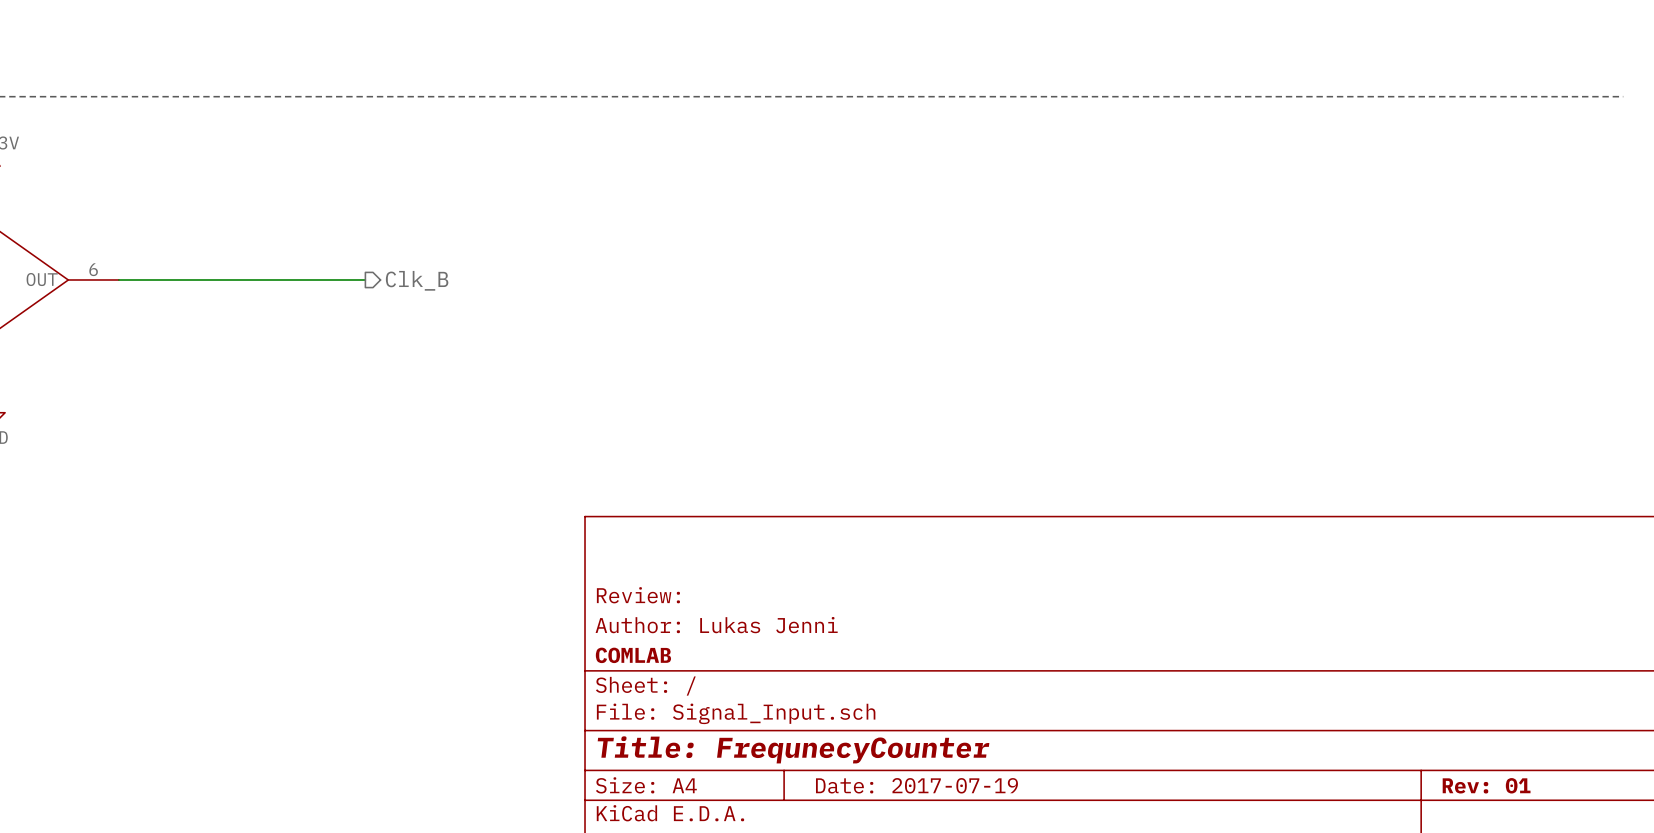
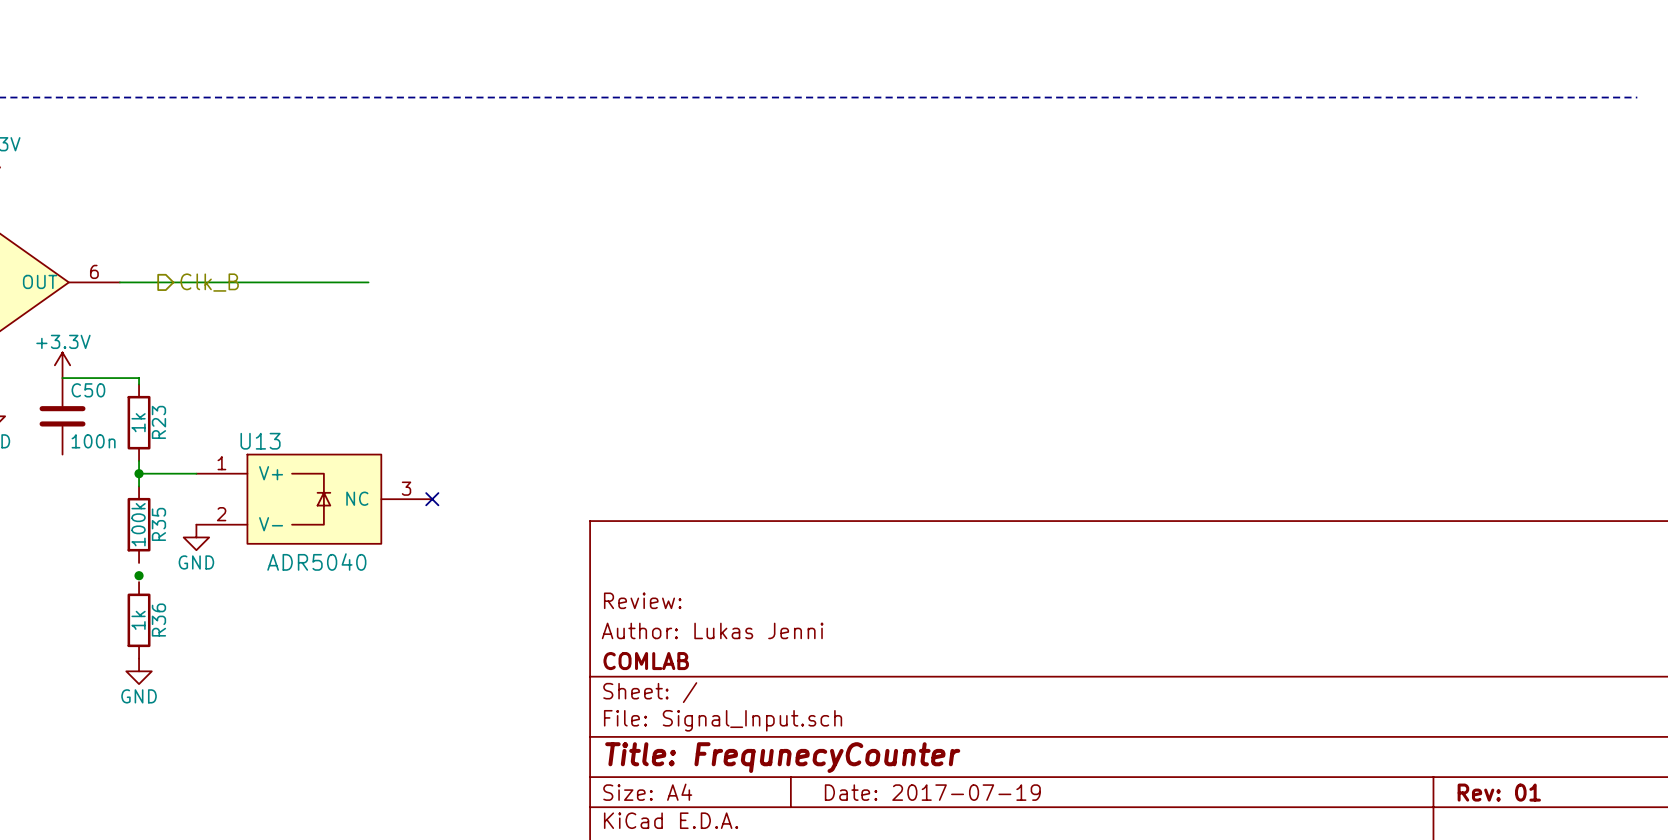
hierarchical label position: Clk_B (417, 280) -> Clk_B (209, 282)
power symbol: none -> +3.3V (62, 365)
wire: none -> (62, 378) (139, 378) (139, 384)
C50: none -> 100n (62, 416)
R23: none -> 1k (139, 422)
wire: none -> (139, 460) (139, 486)
wire: none -> (139, 473) (196, 473)
junction: none -> (139, 473)
U13: none -> ADR5040 (314, 499)
no-connect mark: none -> (432, 499)
R35: none -> 100k (139, 524)
power symbol: none -> GND (196, 537)
junction: none -> (139, 575)
R36: none -> 1k (139, 620)
power symbol: none -> GND (139, 671)

